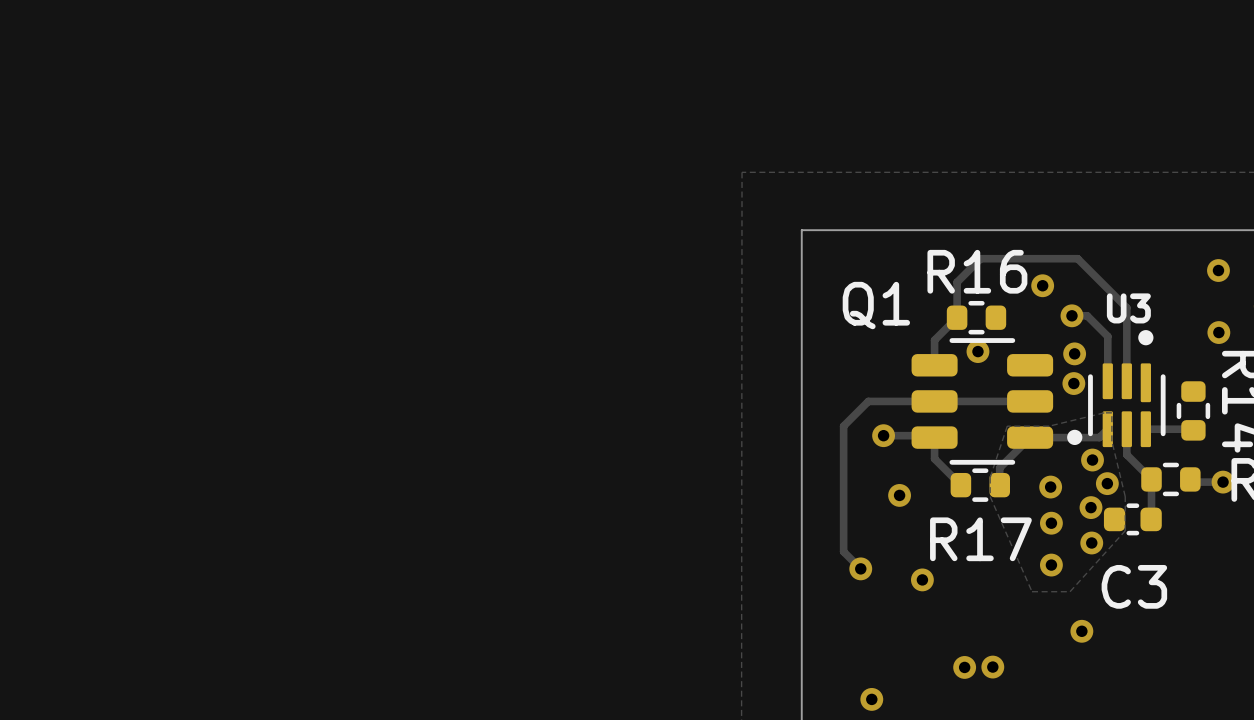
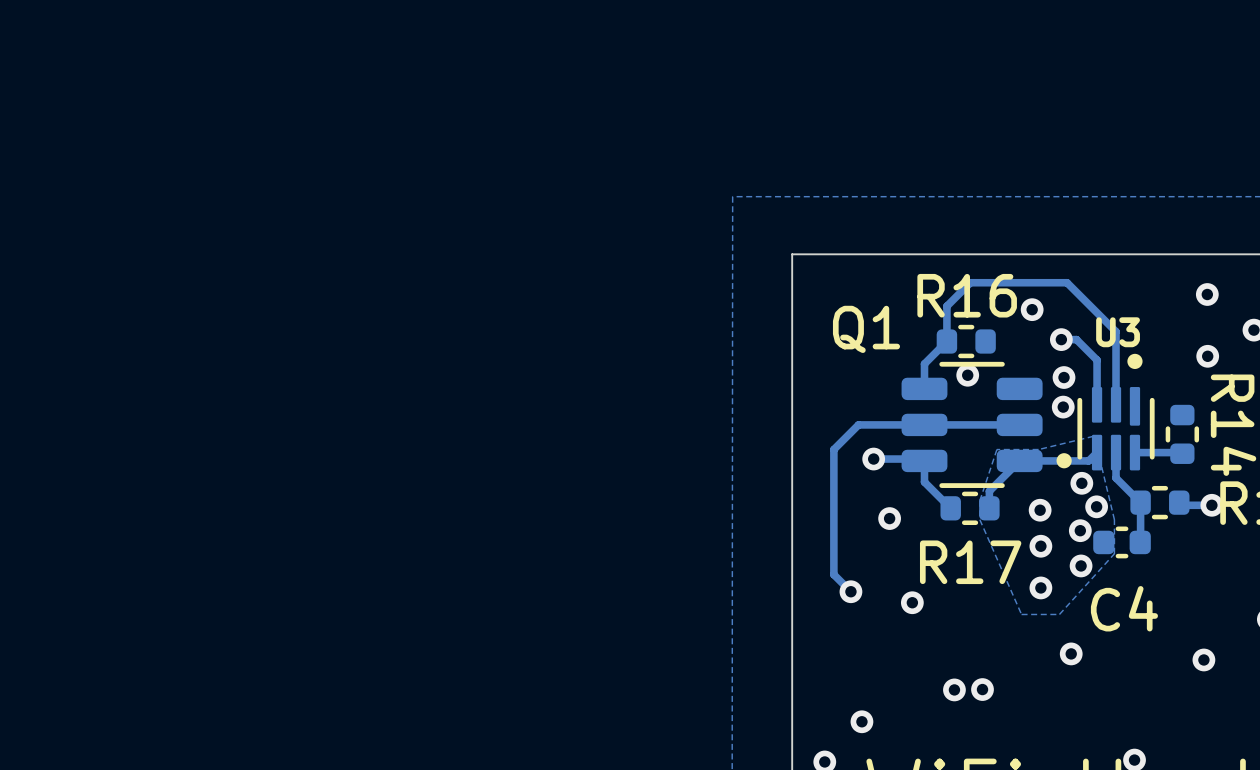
C3 name: C3 (1134, 586) -> C4 (1124, 608)
via: none -> (1203, 659)

